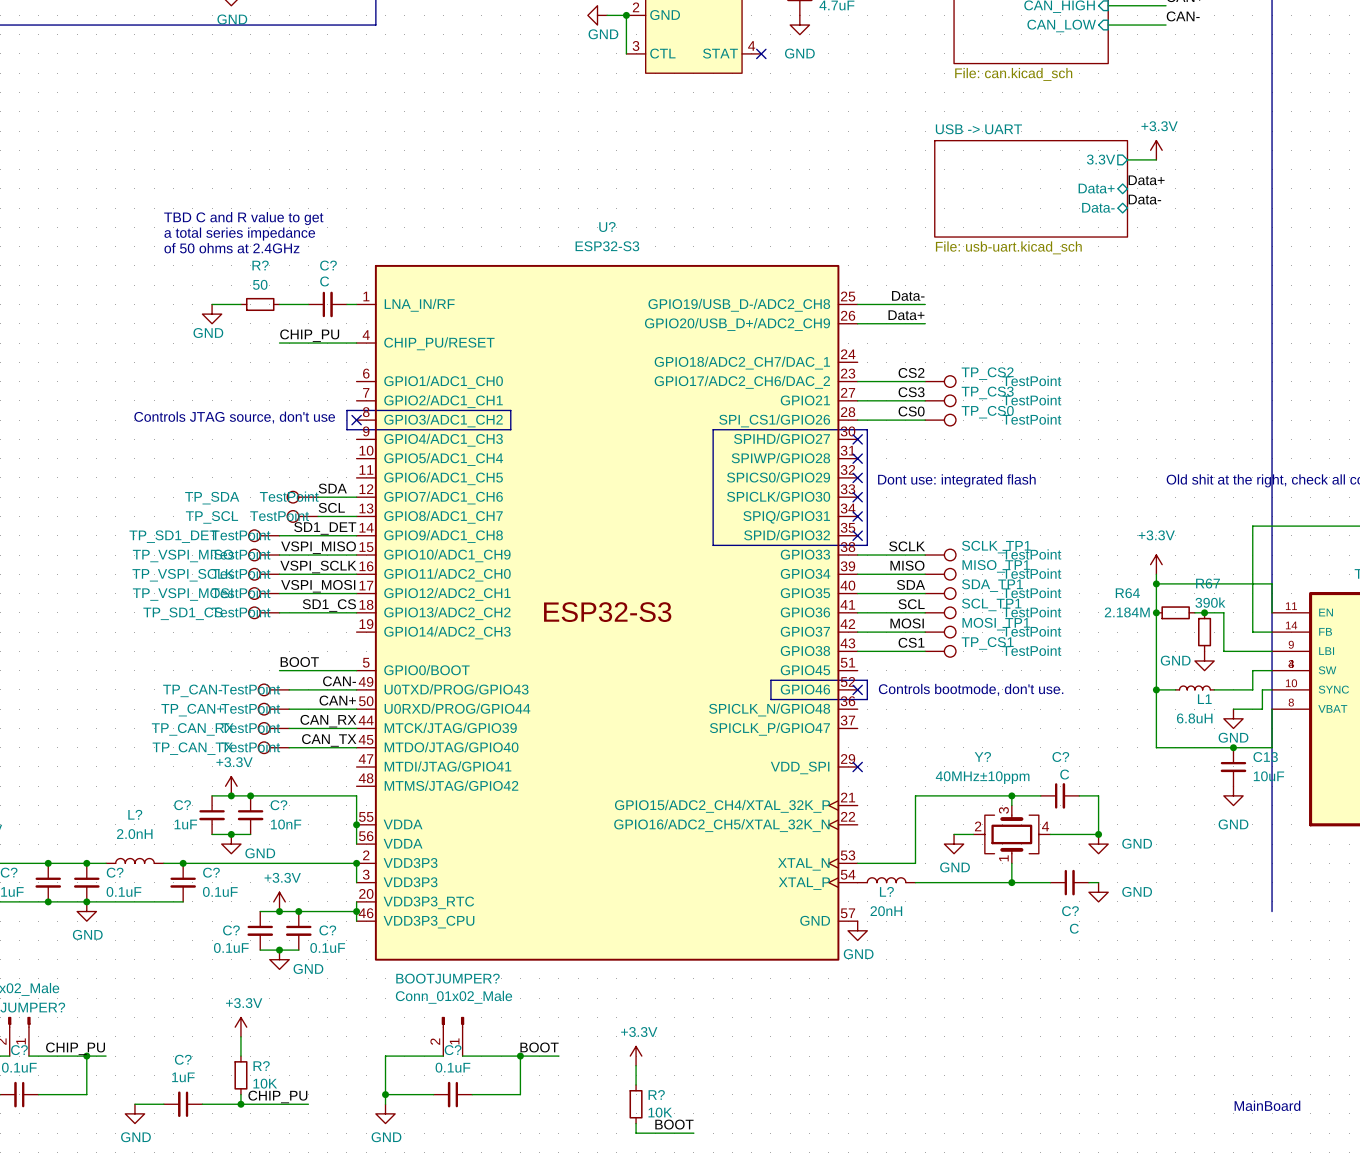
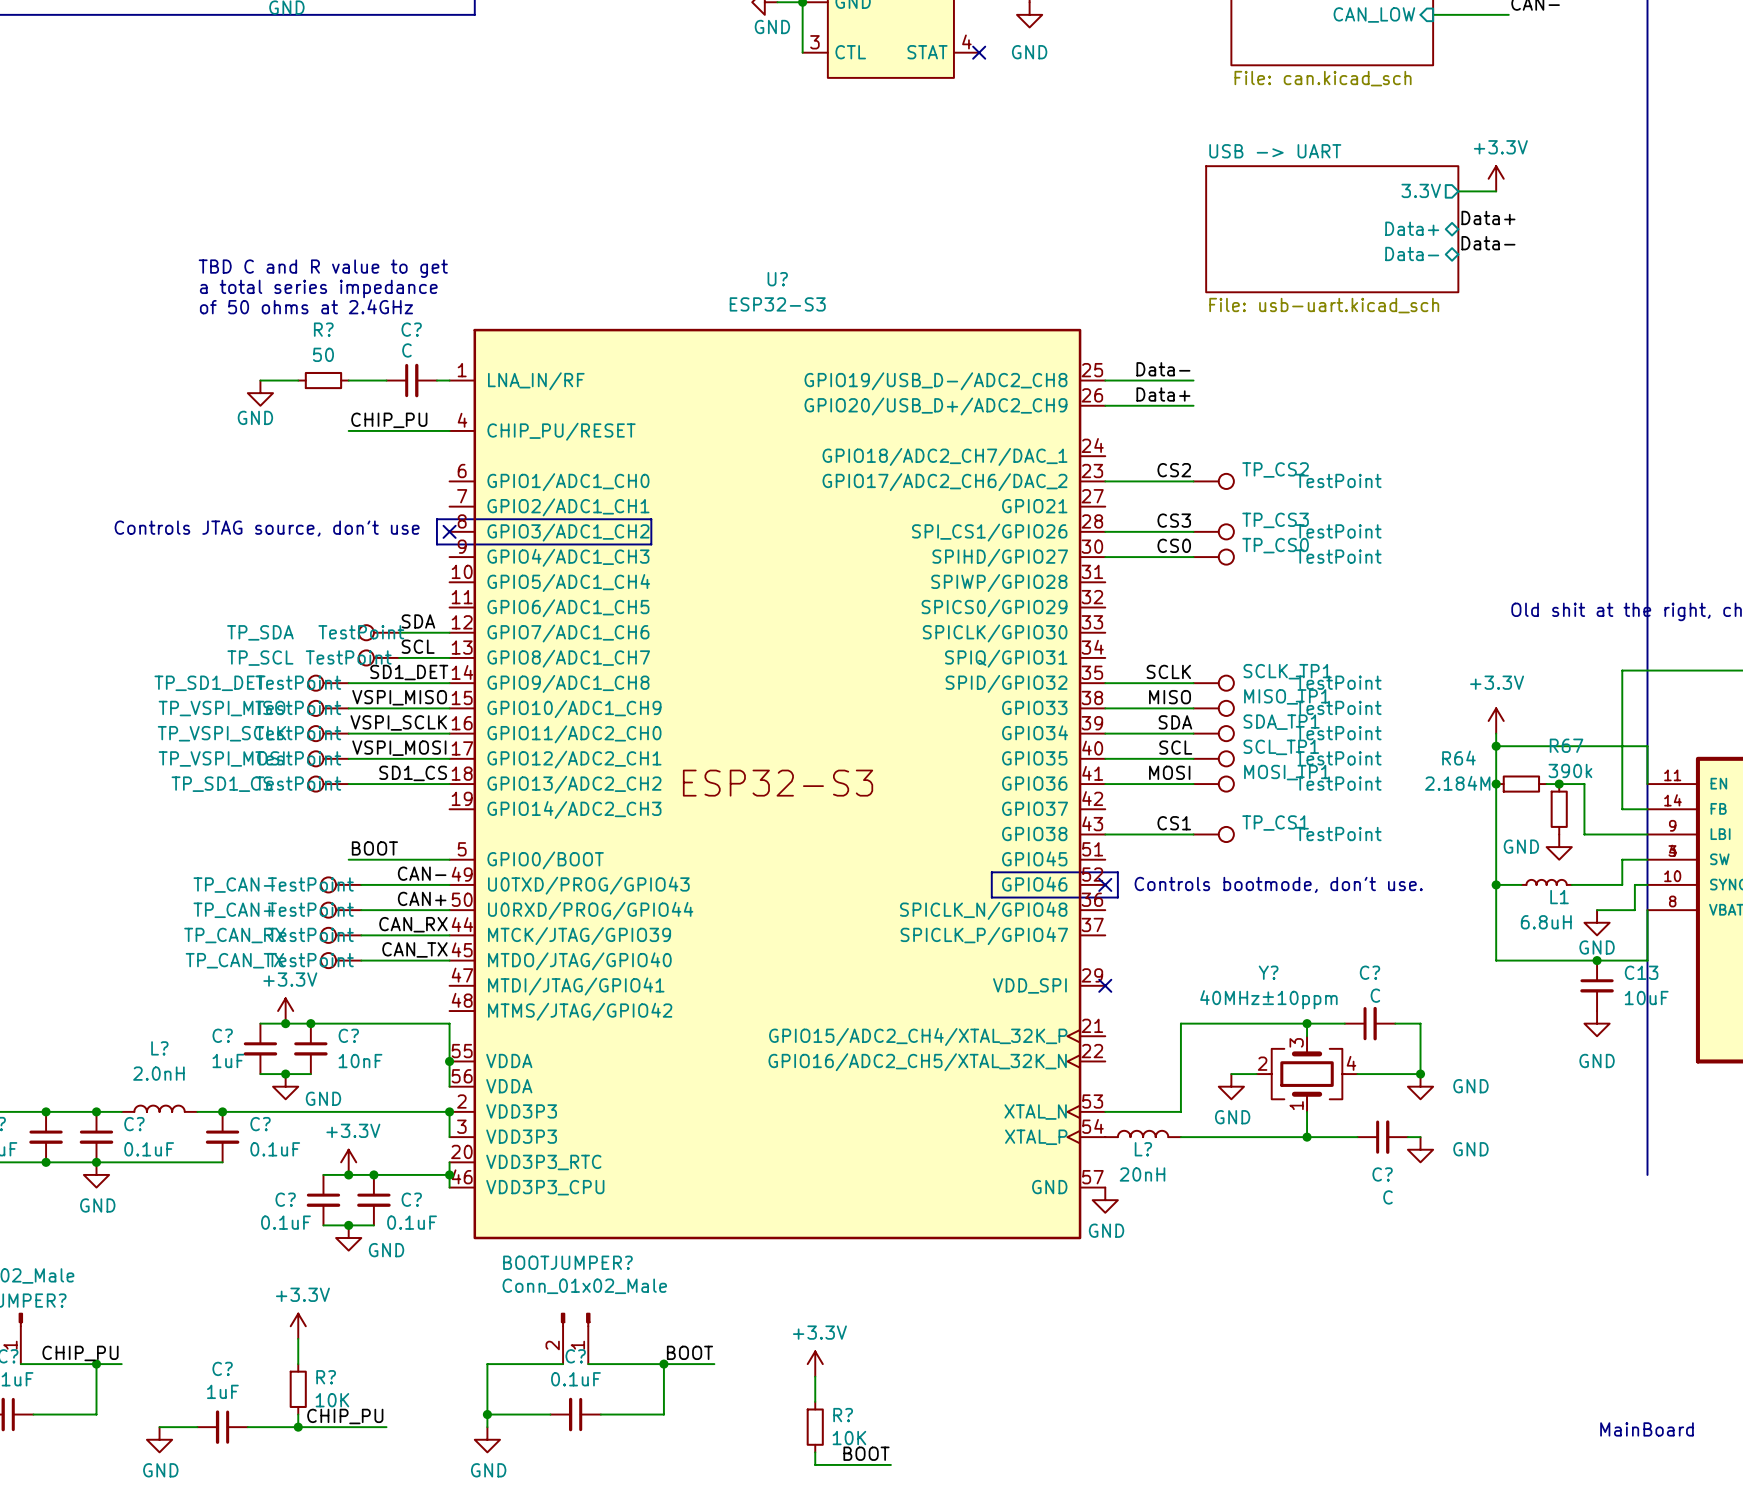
label: CS3 (911, 392) -> none
wire: (857, 400) (925, 400) -> (1105, 557) (1193, 557)
TP_CS3: TestPoint (940, 400) -> none
label: CS0 (911, 411) -> CS3 (1174, 520)
TP_CS0 name: TP_CS0 (987, 412) -> TP_CS3 (1275, 520)
line: (713, 429) (713, 545) (867, 545) (867, 429) (713, 429) -> none
label: none -> CS0 (1174, 545)
no-connect mark: (857, 439) -> none
TP_CS0: none -> TestPoint (1213, 557)
no-connect mark: (857, 458) -> none
no-connect mark: (857, 477) -> none
text: Dont use: integrated flash (956, 480) -> none
no-connect mark: (857, 497) -> none
no-connect mark: (857, 516) -> none
label: none -> SCLK (1168, 671)
no-connect mark: (857, 535) -> none
SCLK_TP1: none -> TestPoint (1213, 683)
label: SCLK (907, 546) -> MISO (1170, 697)
SCLK_TP1 name: SCLK_TP1 (996, 547) -> MISO_TP1 (1286, 696)
label: MISO (907, 565) -> SDA (1175, 722)
MISO_TP1 name: MISO_TP1 (996, 566) -> SDA_TP1 (1281, 722)
label: SDA (911, 584) -> SCL (1175, 747)
SDA_TP1 name: SDA_TP1 (992, 585) -> SCL_TP1 (1281, 747)
label: SCL (911, 604) -> MOSI (1169, 772)
SCL_TP1 name: SCL_TP1 (991, 604) -> MOSI_TP1 (1286, 772)
label: MOSI (907, 623) -> none
wire: (857, 632) (925, 632) -> (1105, 683) (1193, 683)
MOSI_TP1: TestPoint (940, 632) -> none

